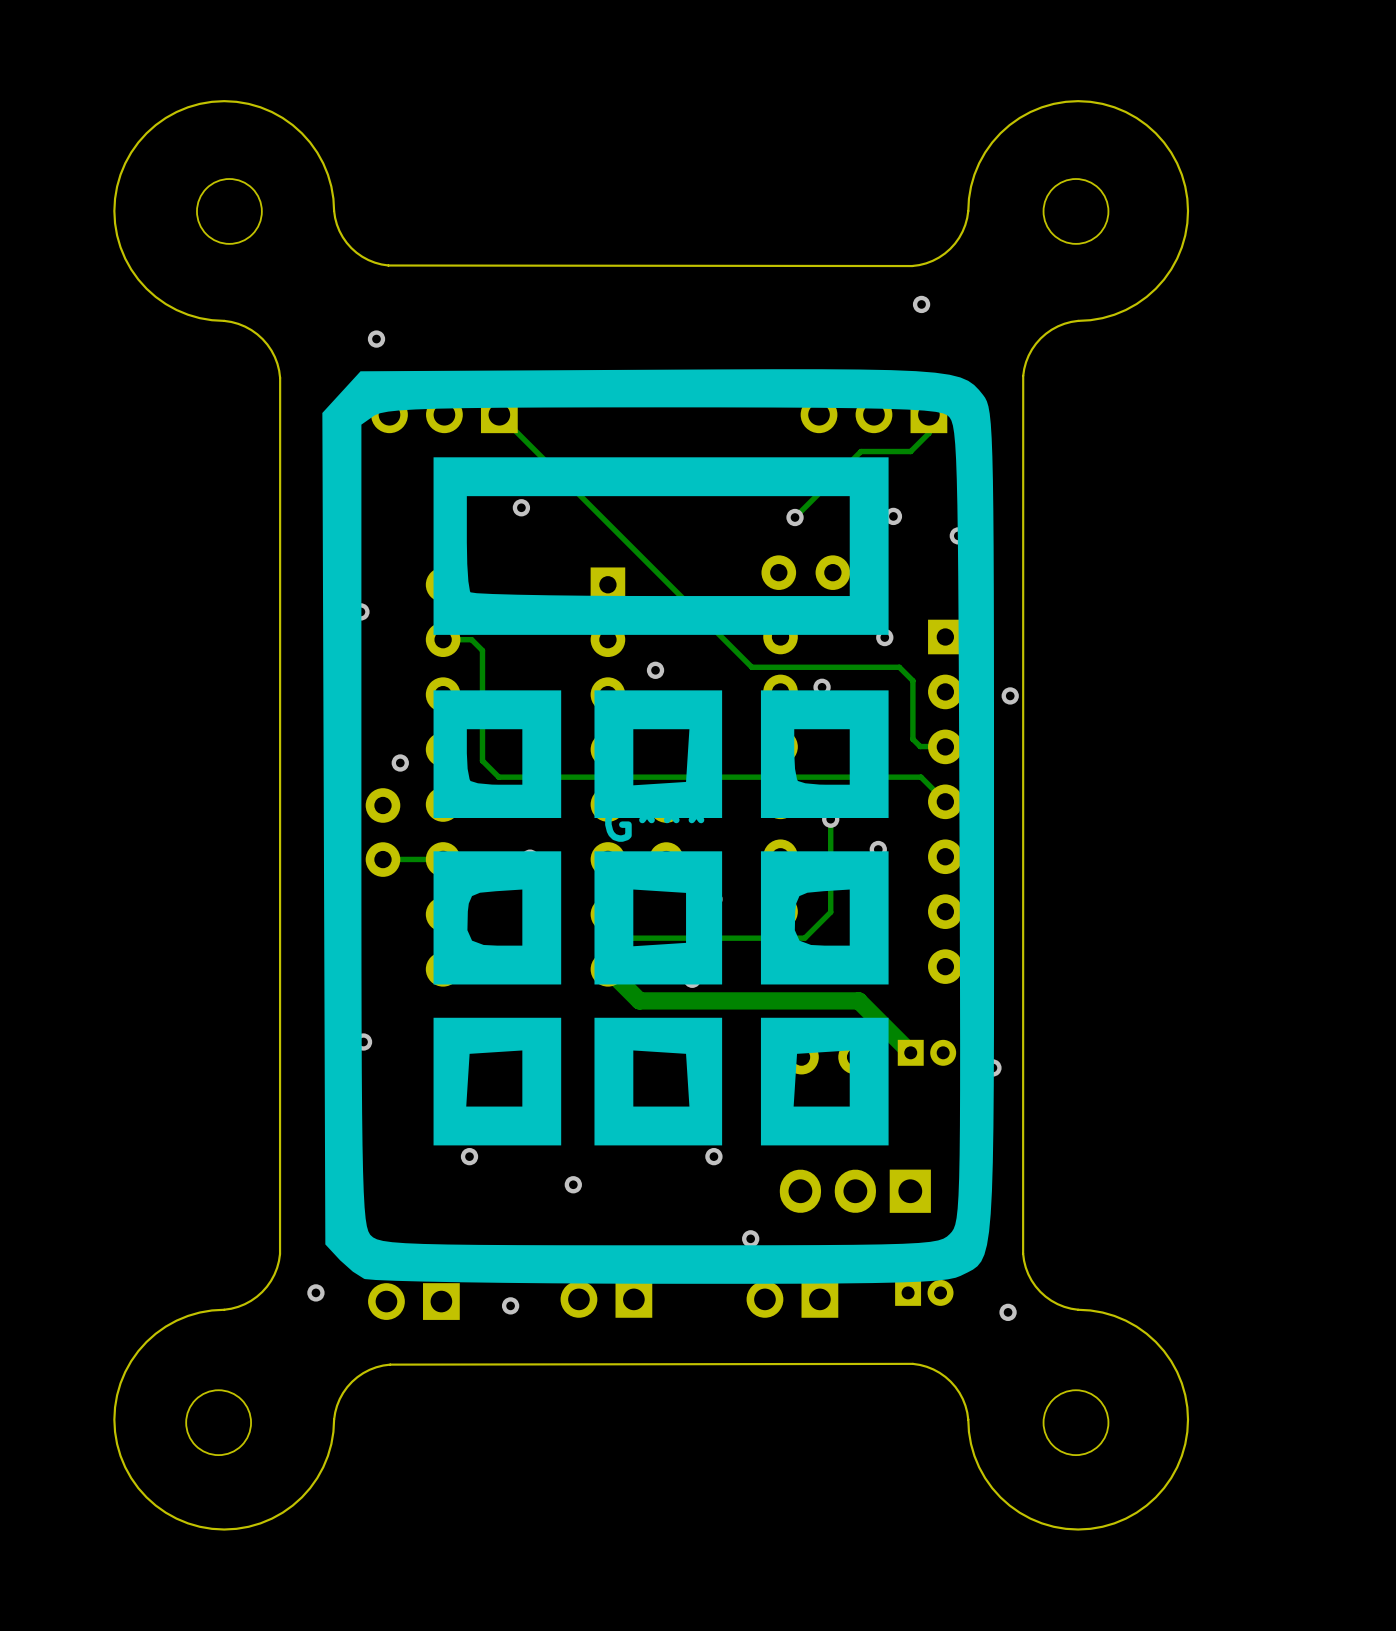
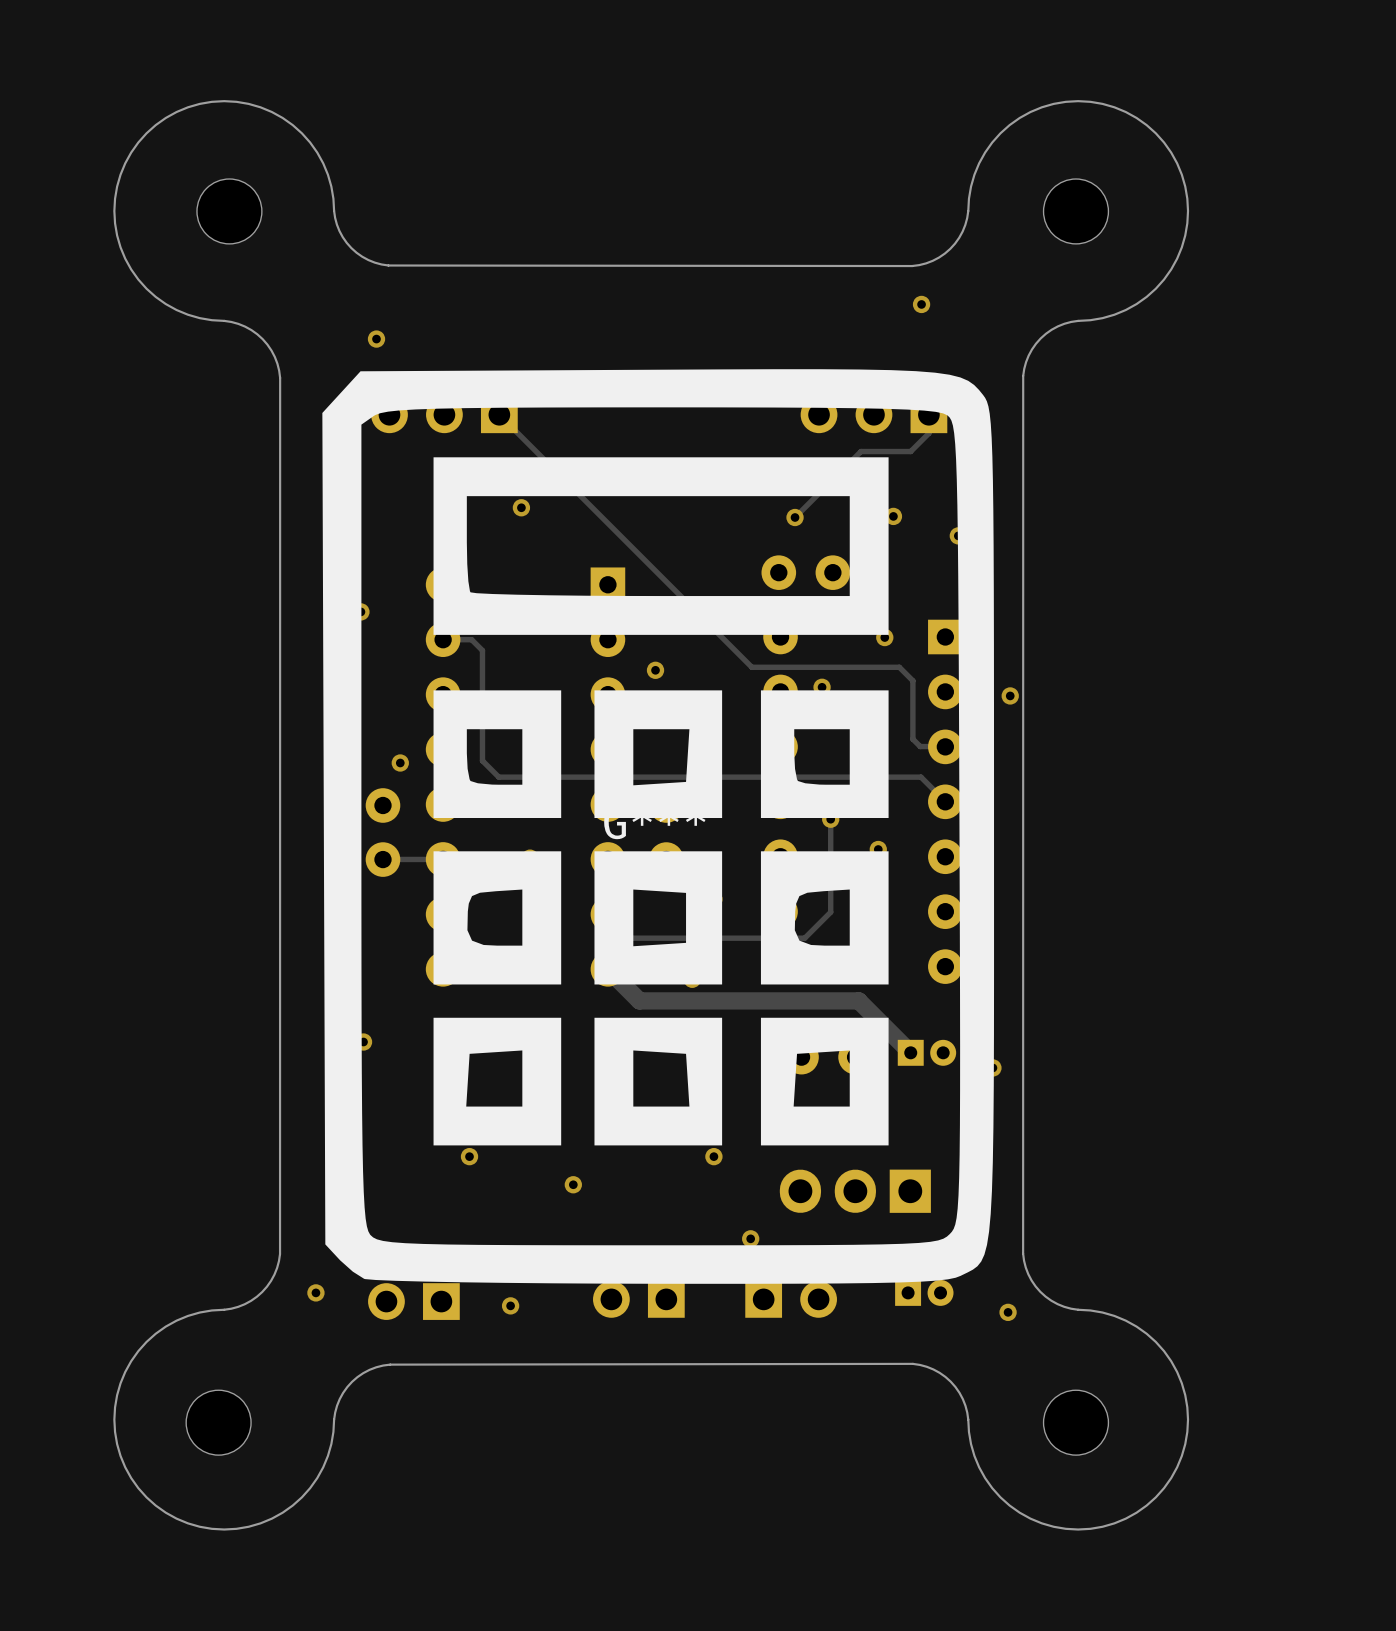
part position: (606, 1299) -> (638, 1299)
part rotation: 0° (792, 1299) -> 180° (791, 1299)

